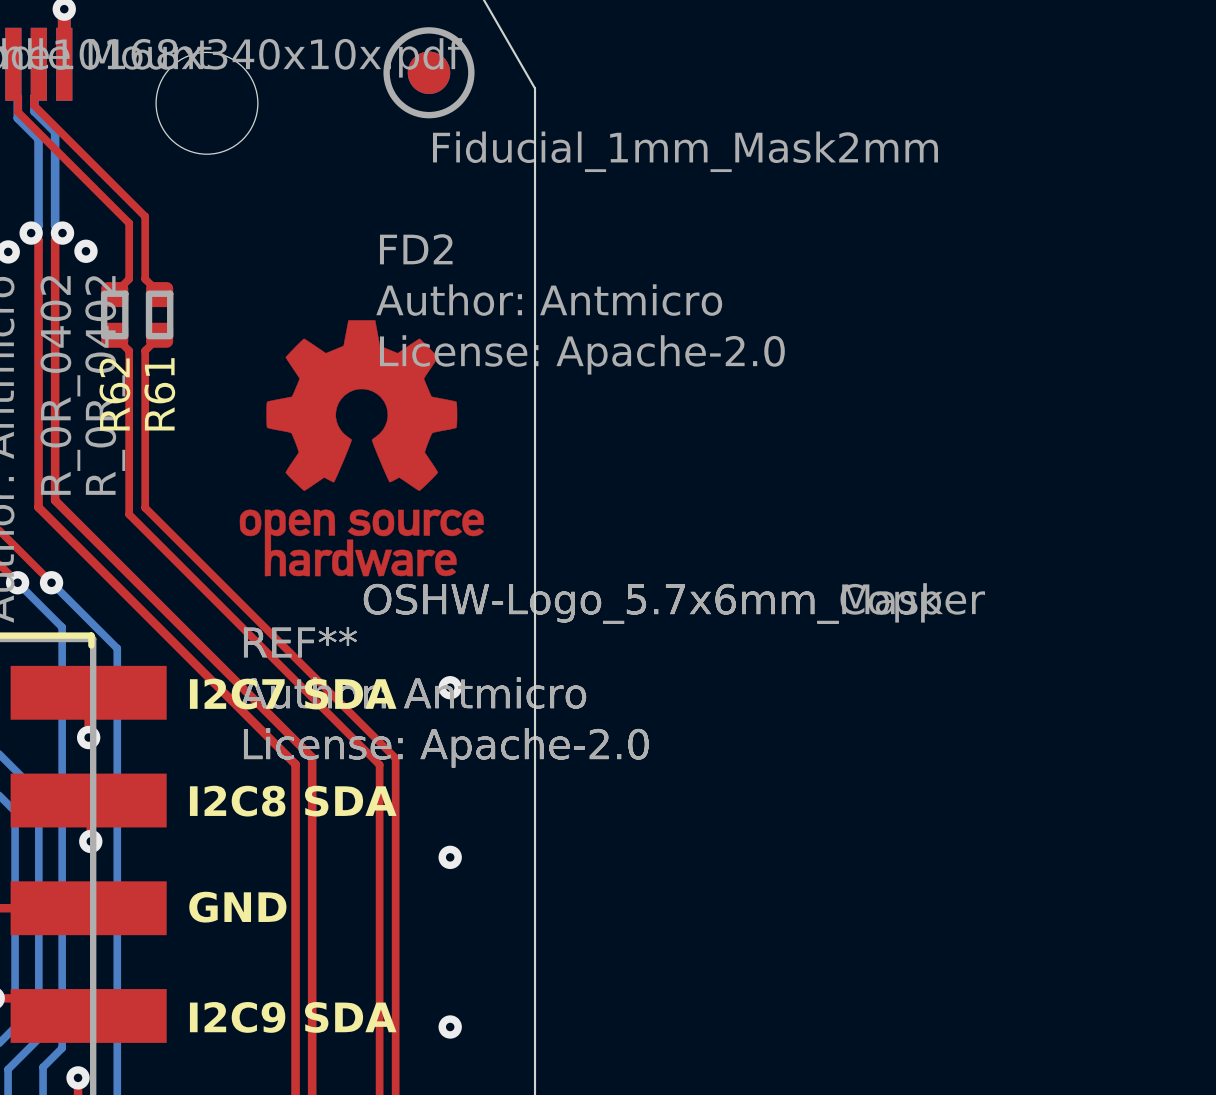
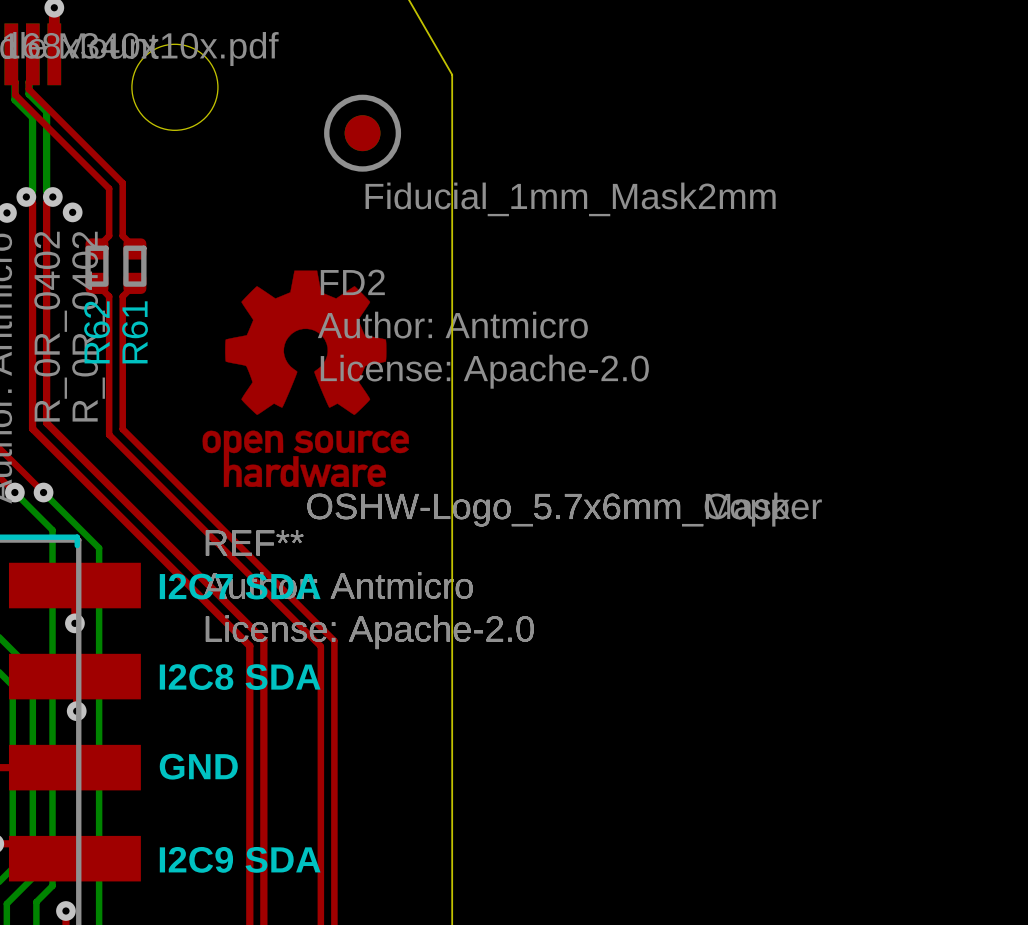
FD2 position: (428, 72) -> (362, 133)
via: (450, 687) -> none
via: (450, 857) -> none
via: (450, 1027) -> none

